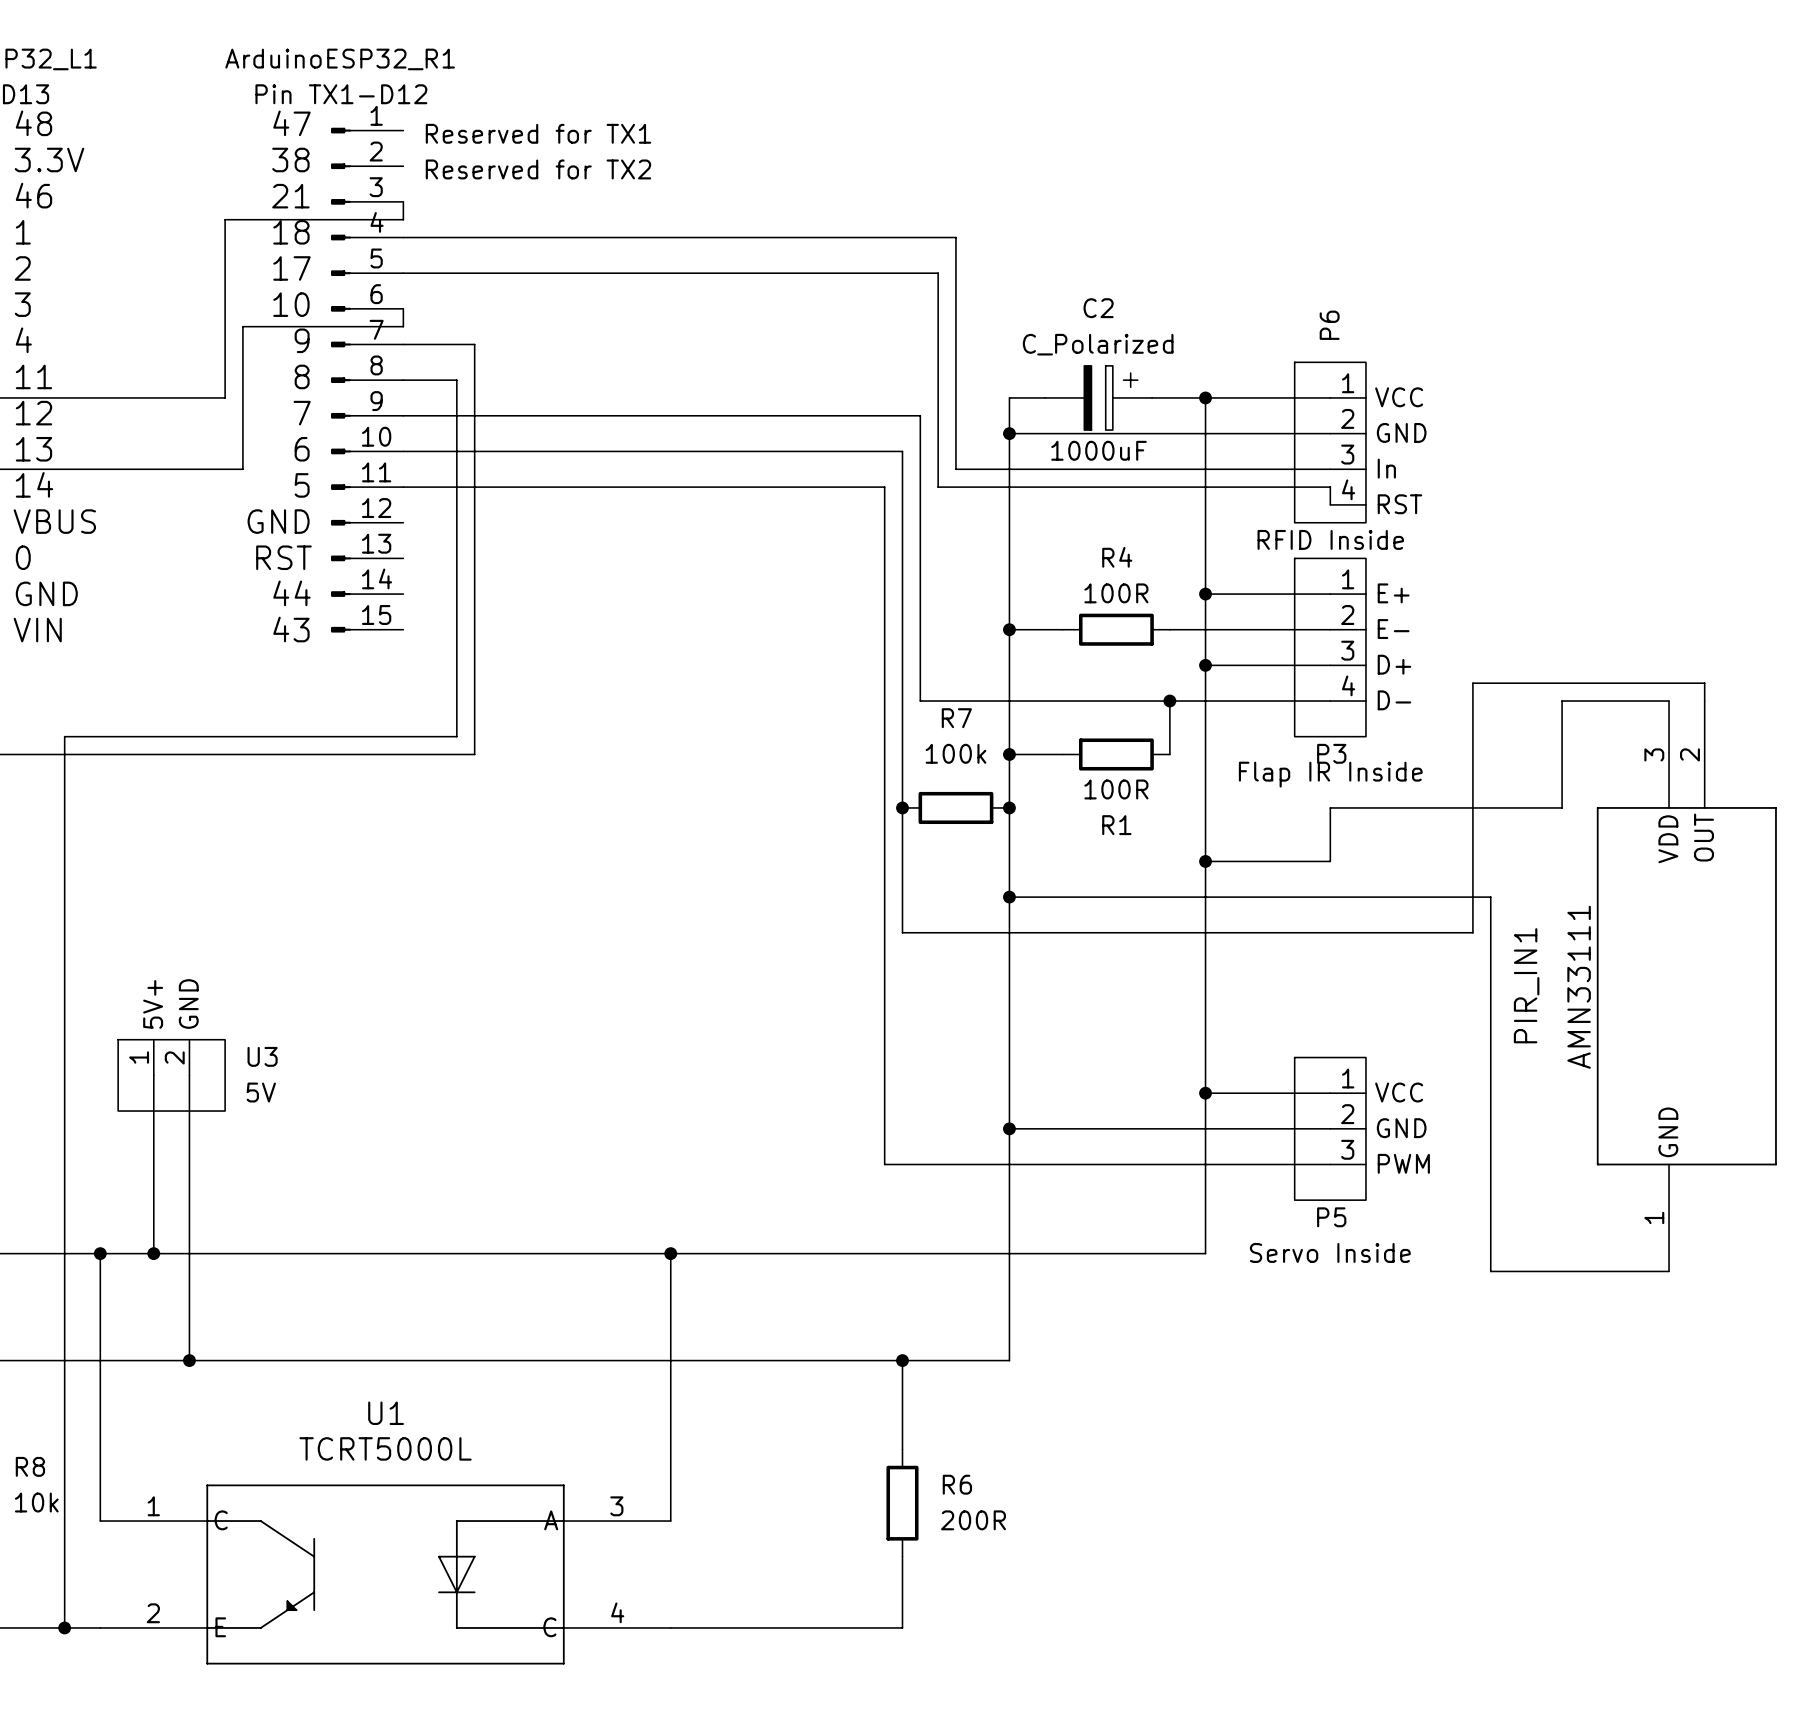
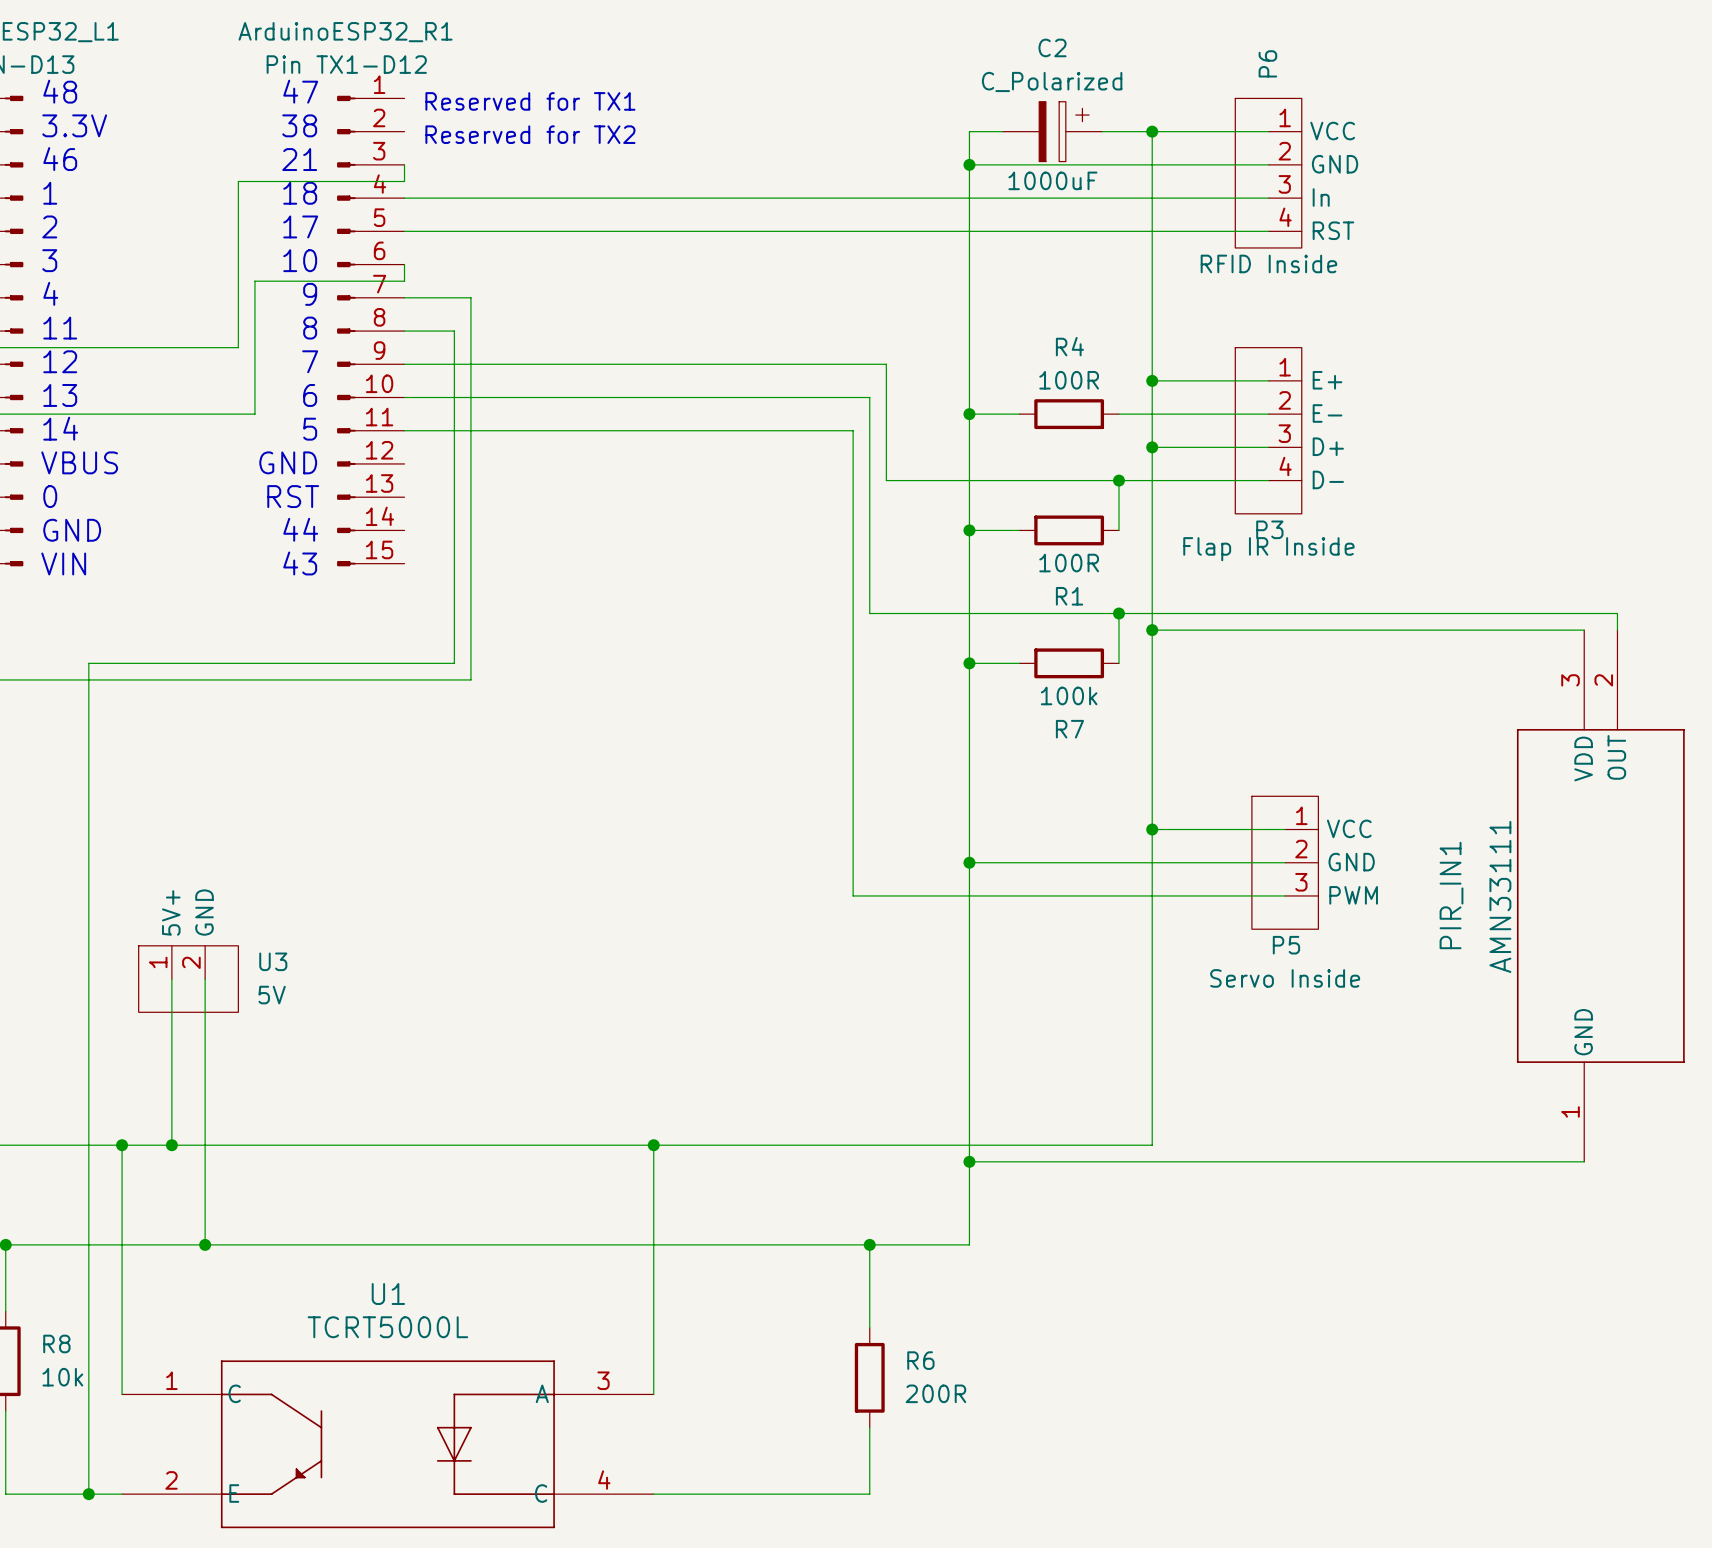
wire: none -> (1152, 131) (1152, 347)
junction: none -> (1152, 131)
wire: none -> (969, 164) (1268, 164)
junction: none -> (969, 164)
wire: (955, 237) (955, 469) (1009, 469) -> (919, 198) (1268, 198)
wire: (938, 273) (938, 487) (1330, 487) (1330, 504) -> (902, 231) (1268, 231)
wire: (1009, 397) (1045, 397) -> (969, 347) (969, 131) (1002, 131)
C2 position: (1098, 397) -> (1052, 131)
wire: (1152, 397) (1330, 397) -> (1102, 131) (1268, 131)
junction position: (1205, 397) -> (1152, 380)
wire: (1009, 433) (1205, 433) -> none
junction position: (1009, 433) -> (969, 414)
P6 position: (1330, 442) -> (1268, 173)
wire: (1062, 469) (1169, 469) -> none
junction: none -> (1152, 447)
wire: (920, 540) (920, 701) (1205, 701) -> (886, 480) (1268, 480)
wire: none -> (1118, 480) (1118, 530)
junction: none -> (1118, 480)
wire: (1205, 594) (1330, 594) -> none
junction: (1205, 594) -> none
wire: (1009, 629) (1062, 629) -> (969, 663) (1019, 663)
junction position: (1009, 629) -> (969, 530)
R4 position: (1116, 629) -> (1069, 414)
wire: (1169, 629) (1330, 629) -> none
P3 position: (1330, 647) -> (1268, 430)
wire: (1205, 665) (1330, 665) -> (1152, 447) (1268, 447)
junction: (1205, 665) -> none
wire: (902, 683) (902, 932) (1472, 932) (1472, 683) -> (869, 613) (1401, 613)
junction: none -> (1118, 613)
junction: (1169, 701) -> none
junction: none -> (1152, 630)
wire: (1562, 701) (1562, 807) (1330, 807) (1330, 861) (1205, 861) -> (1484, 630) (1268, 630)
R7 name position: R7 (956, 718) -> R7 (1069, 729)
wire: (1169, 736) (1169, 754) -> (1118, 613) (1118, 630)
R7 value position: 100k (955, 753) -> 100k (1069, 695)
wire: (1009, 754) (1062, 754) -> (969, 530) (1019, 530)
junction position: (1009, 754) -> (969, 663)
R1 position: (1116, 754) -> (1069, 530)
junction: (902, 807) -> none
R7 position: (955, 807) -> (1069, 663)
junction: (1009, 807) -> none
junction position: (1205, 861) -> (1152, 829)
wire: (1009, 897) (1490, 897) (1490, 1271) -> (969, 1161) (1418, 1161)
junction position: (1009, 897) -> (969, 862)
wire: none -> (1152, 829) (1285, 829)
wire: none -> (969, 862) (1285, 862)
wire: (884, 986) (884, 1164) (1330, 1164) -> (853, 895) (1285, 895)
wire: (1205, 1093) (1330, 1093) -> none
junction: (1205, 1093) -> none
wire: (1009, 1128) (1330, 1128) -> none
junction: (1009, 1128) -> none
P5 position: (1330, 1128) -> (1285, 862)
junction: none -> (969, 1161)

